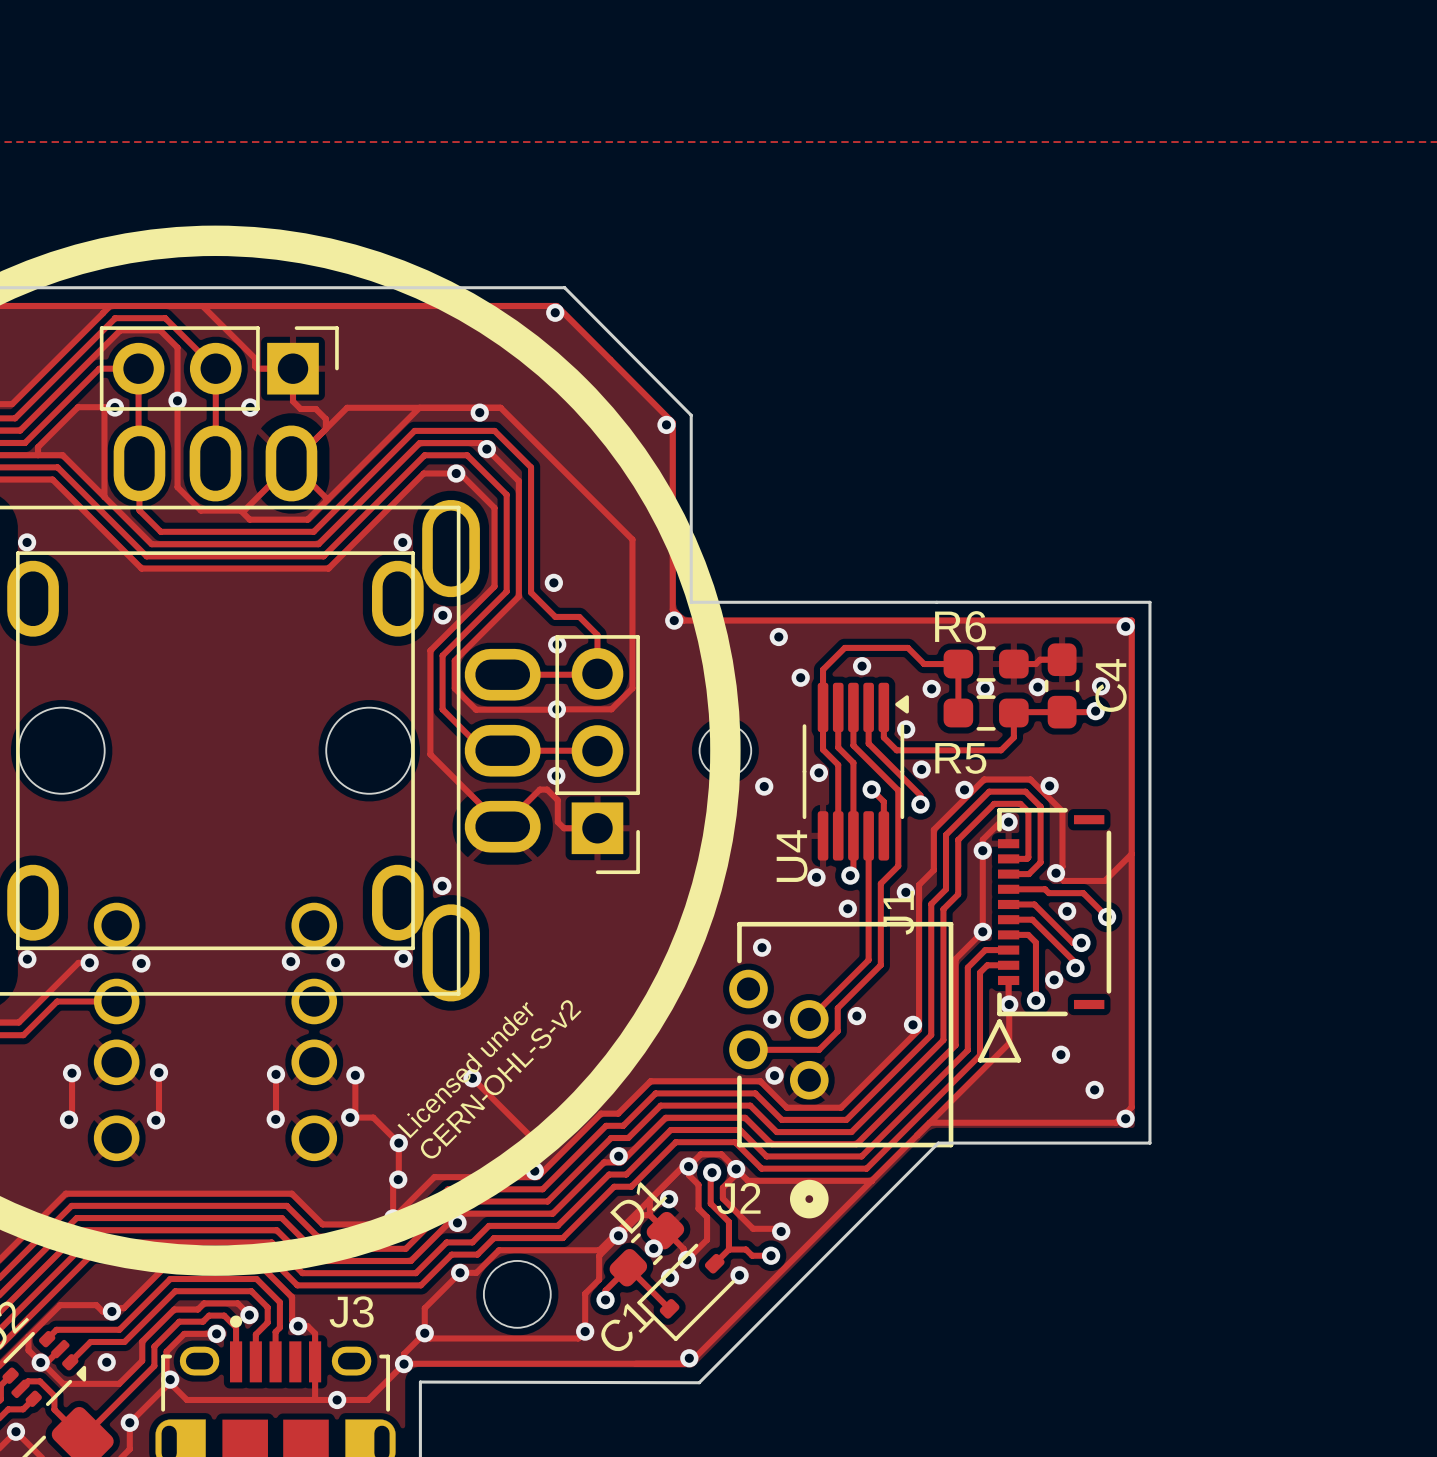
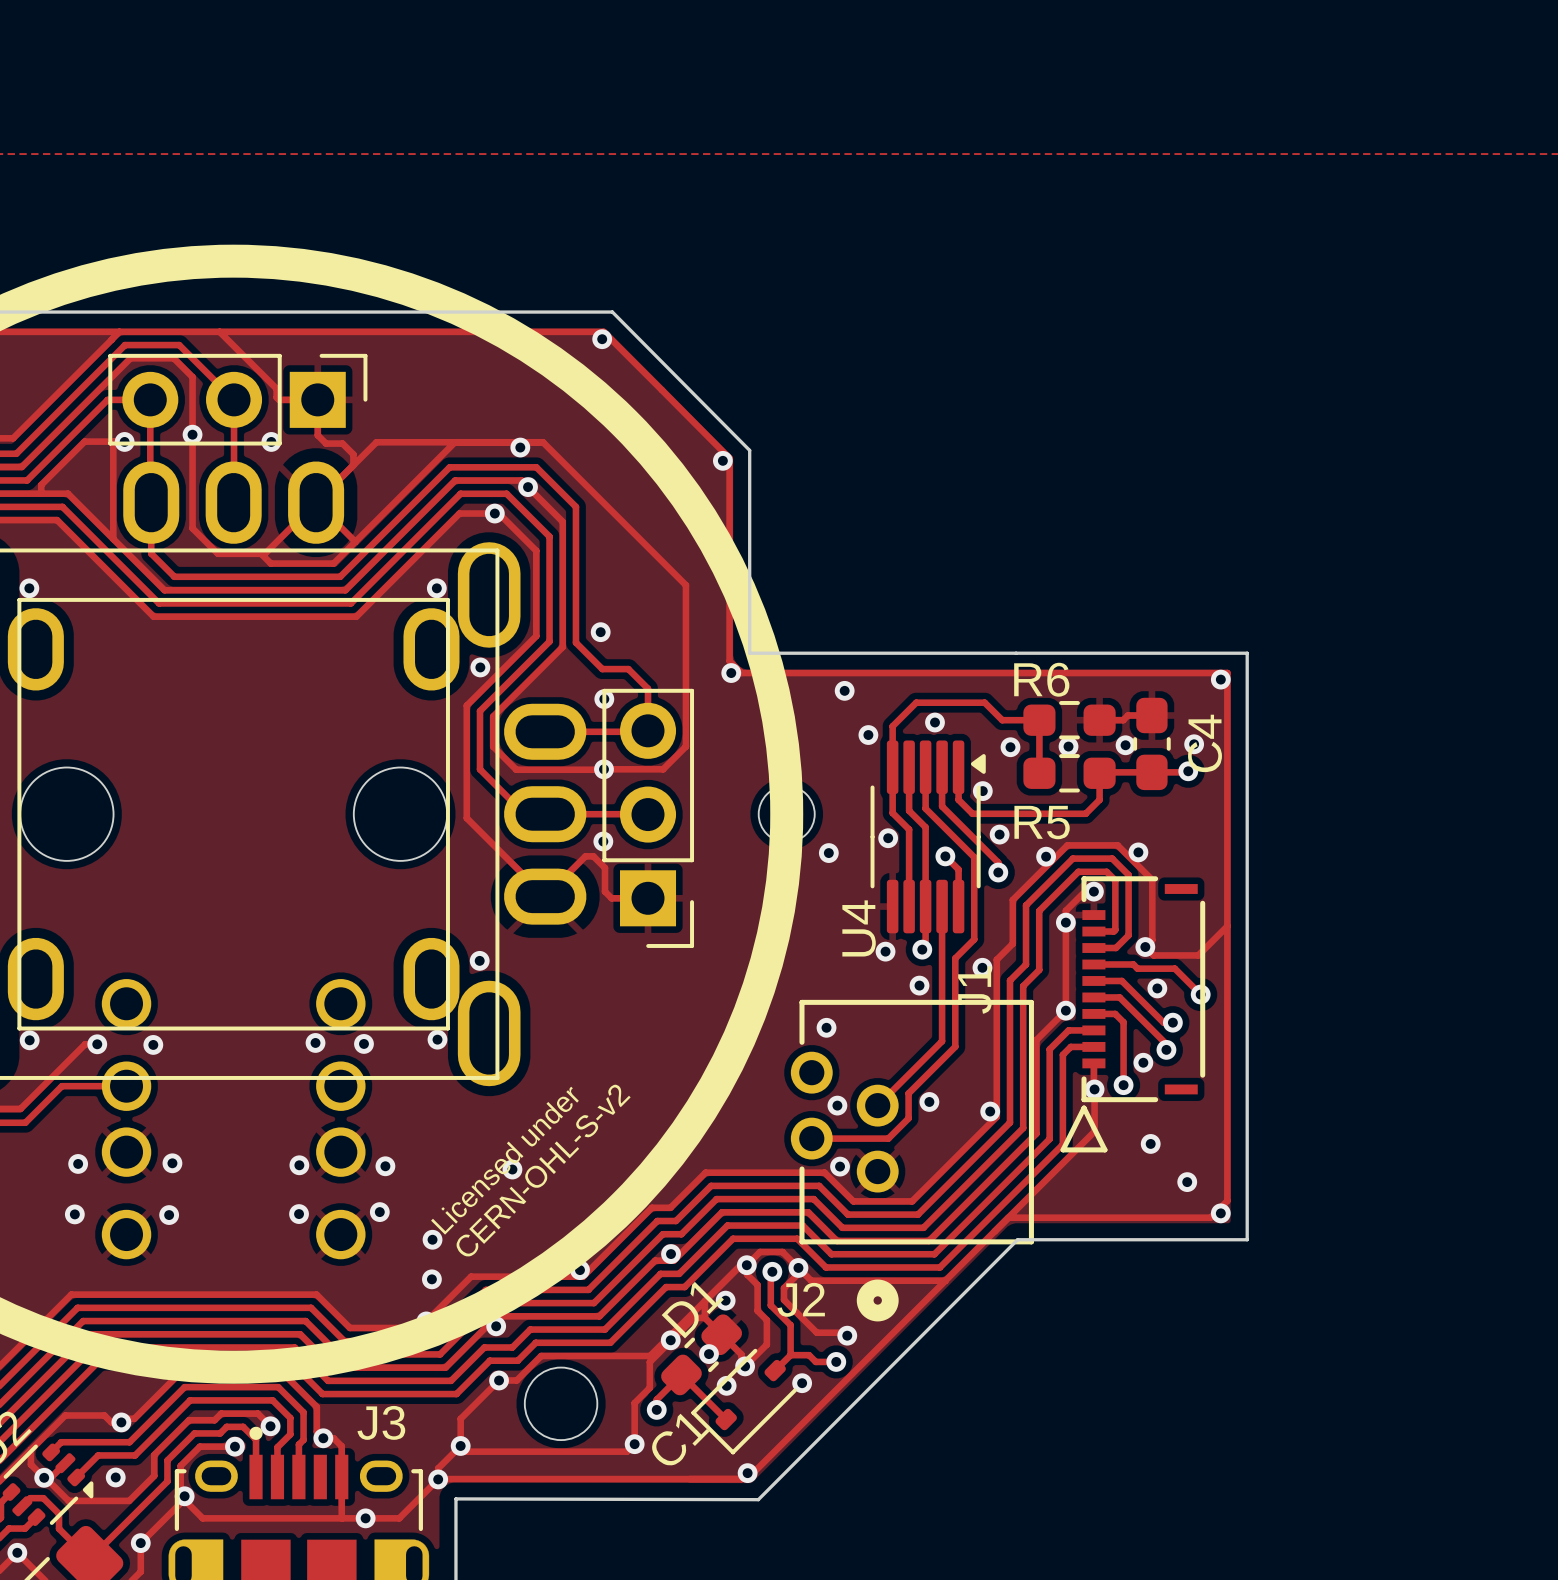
track: (158, 1072) (158, 1117) (155, 1120) -> none
track: (72, 1073) (72, 1116) (69, 1119) -> none
track: (276, 1074) (276, 1119) -> none
track: (355, 1075) (355, 1112) (350, 1117) (373, 1117) (398, 1143) (398, 1179) (393, 1184) (393, 1218) -> none
track: (472, 1078) (534, 1140) (534, 1171) -> none

